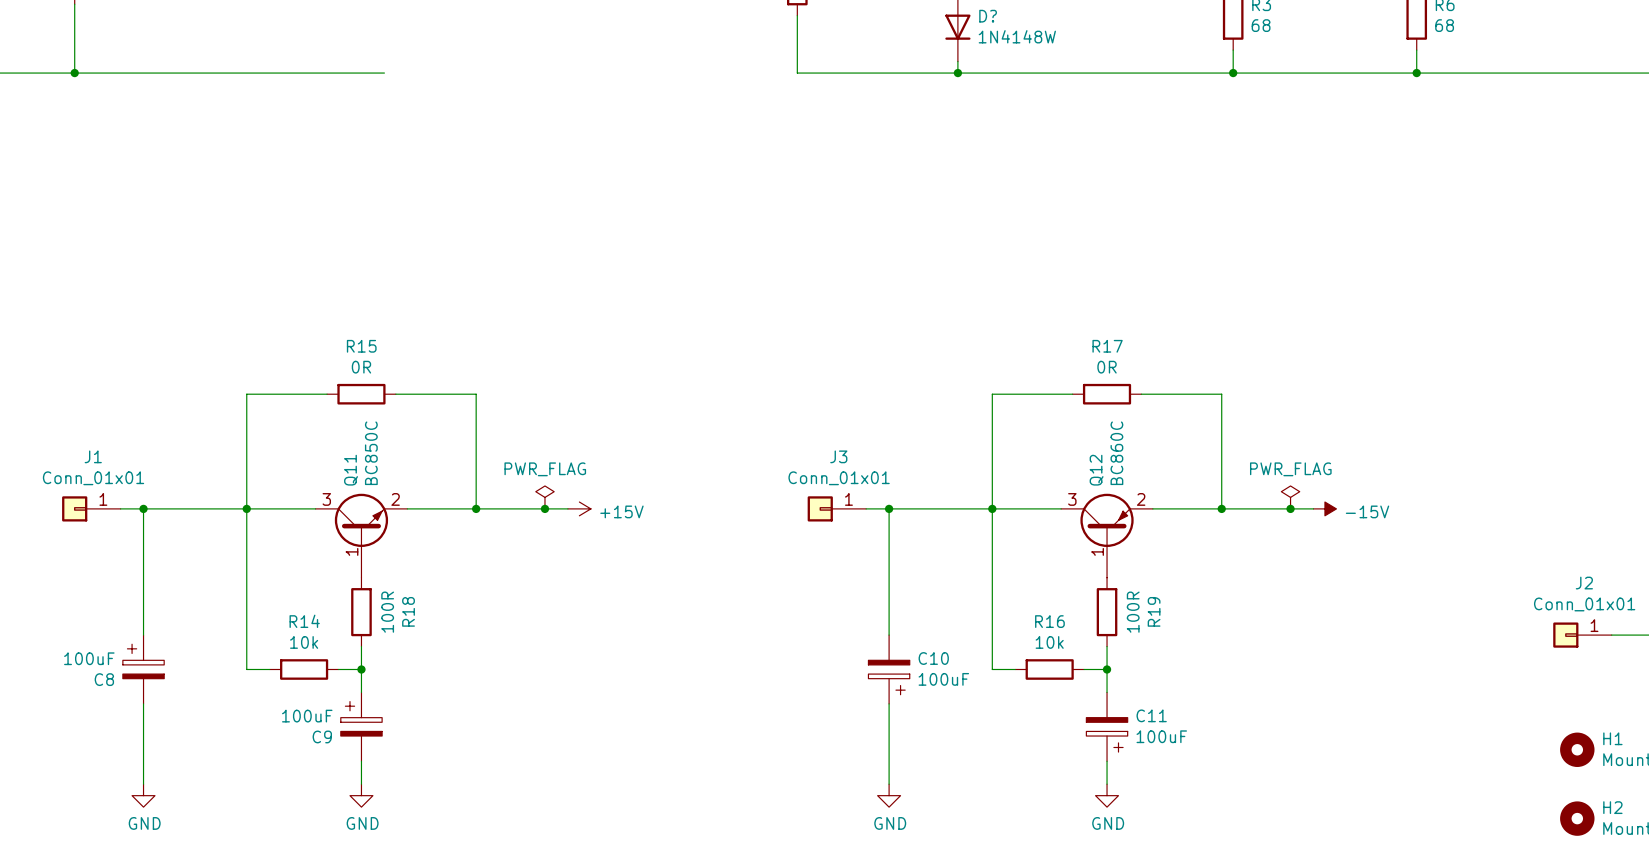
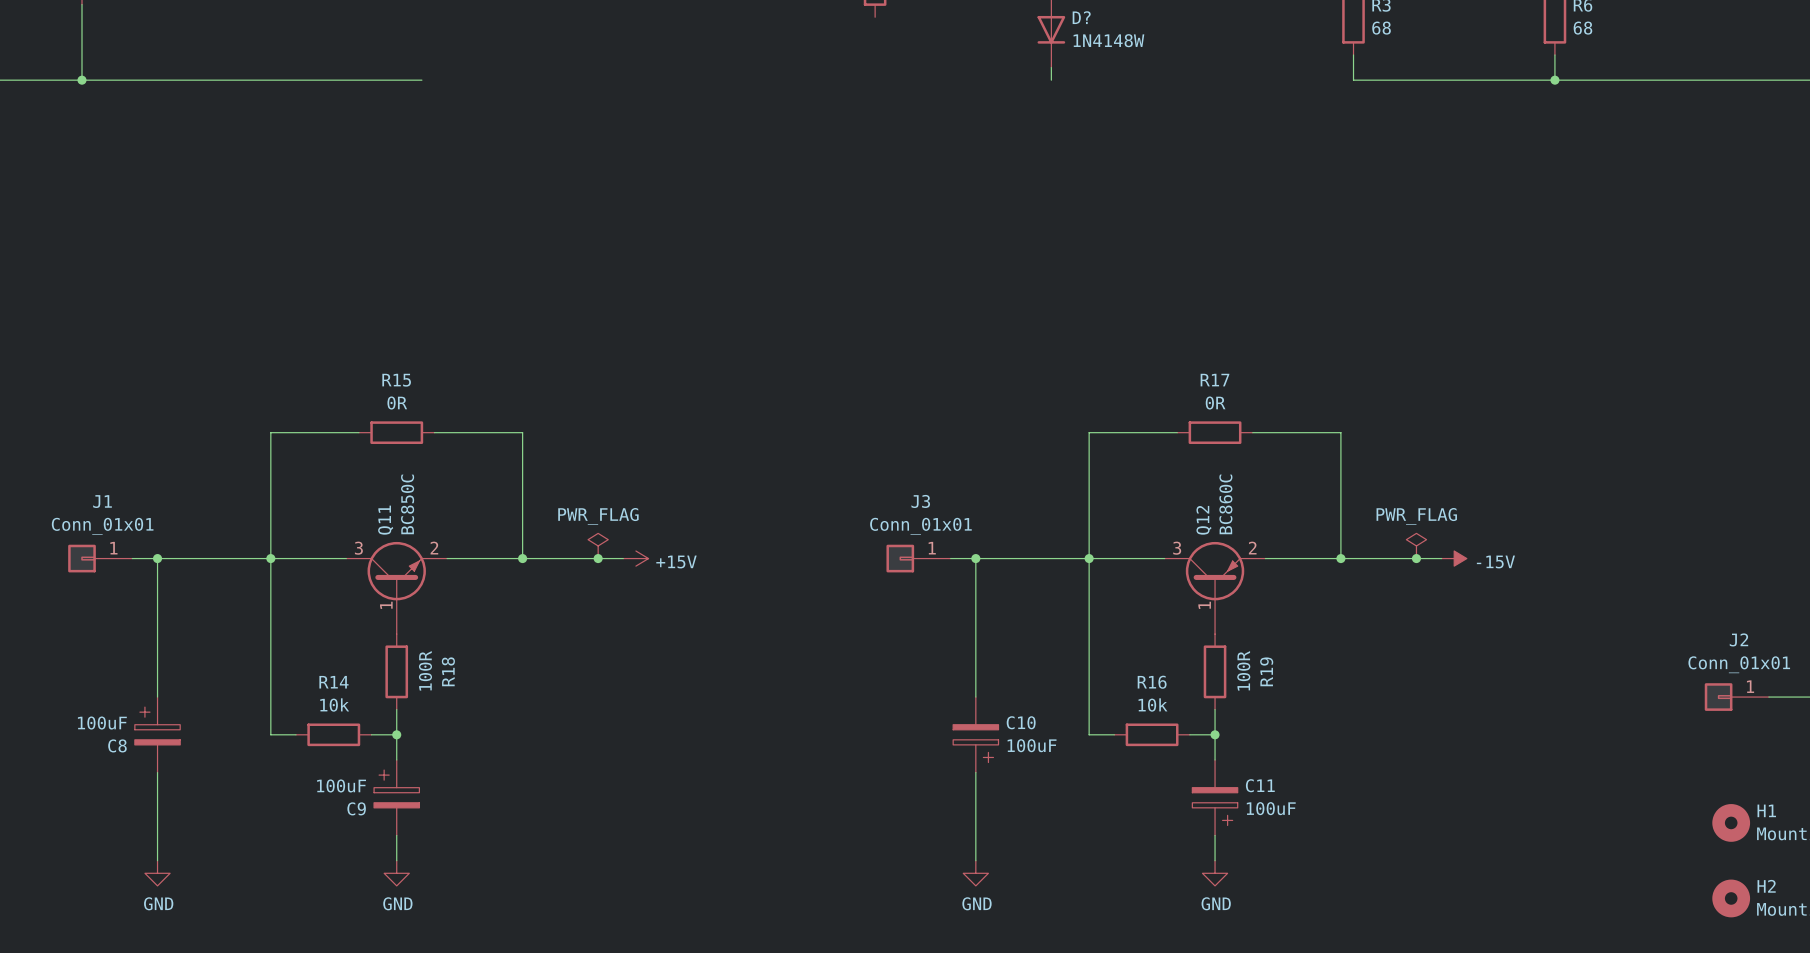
wire: (797, 15) (797, 73) (1233, 73) -> none
junction: (957, 73) -> none
junction: (1233, 73) -> none

